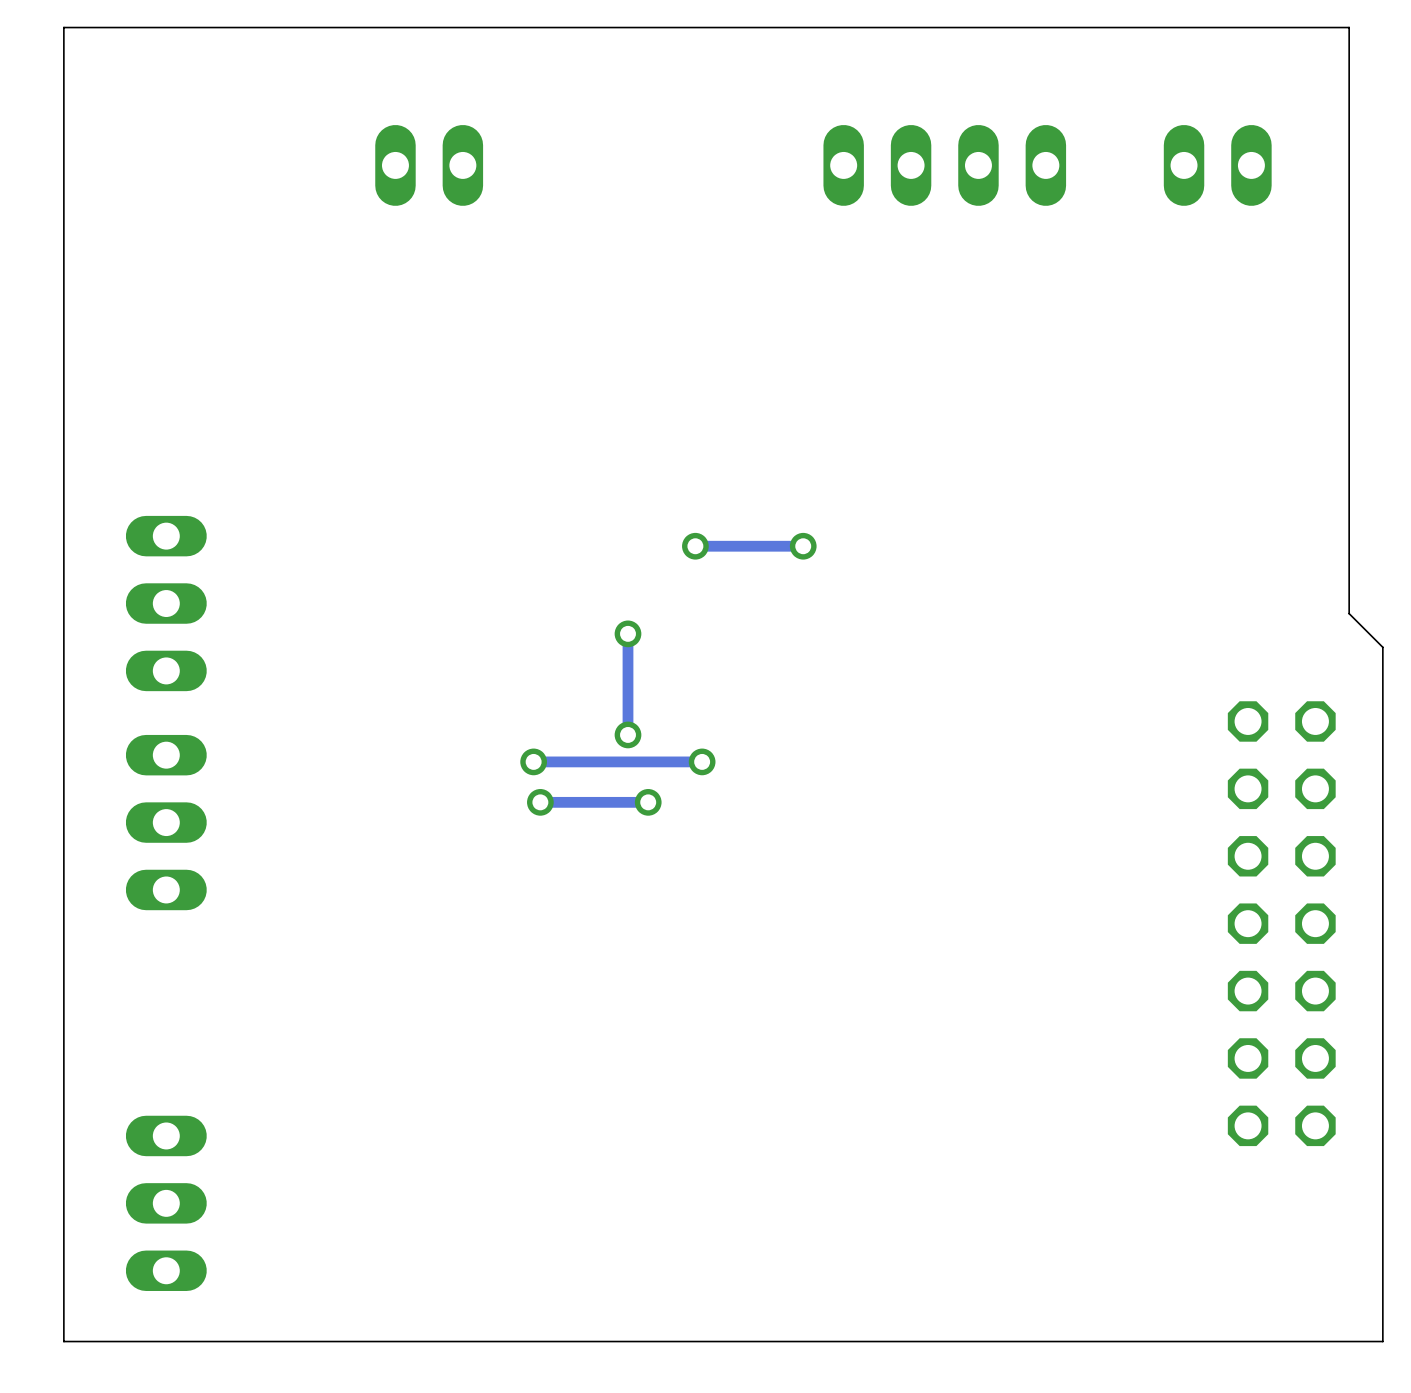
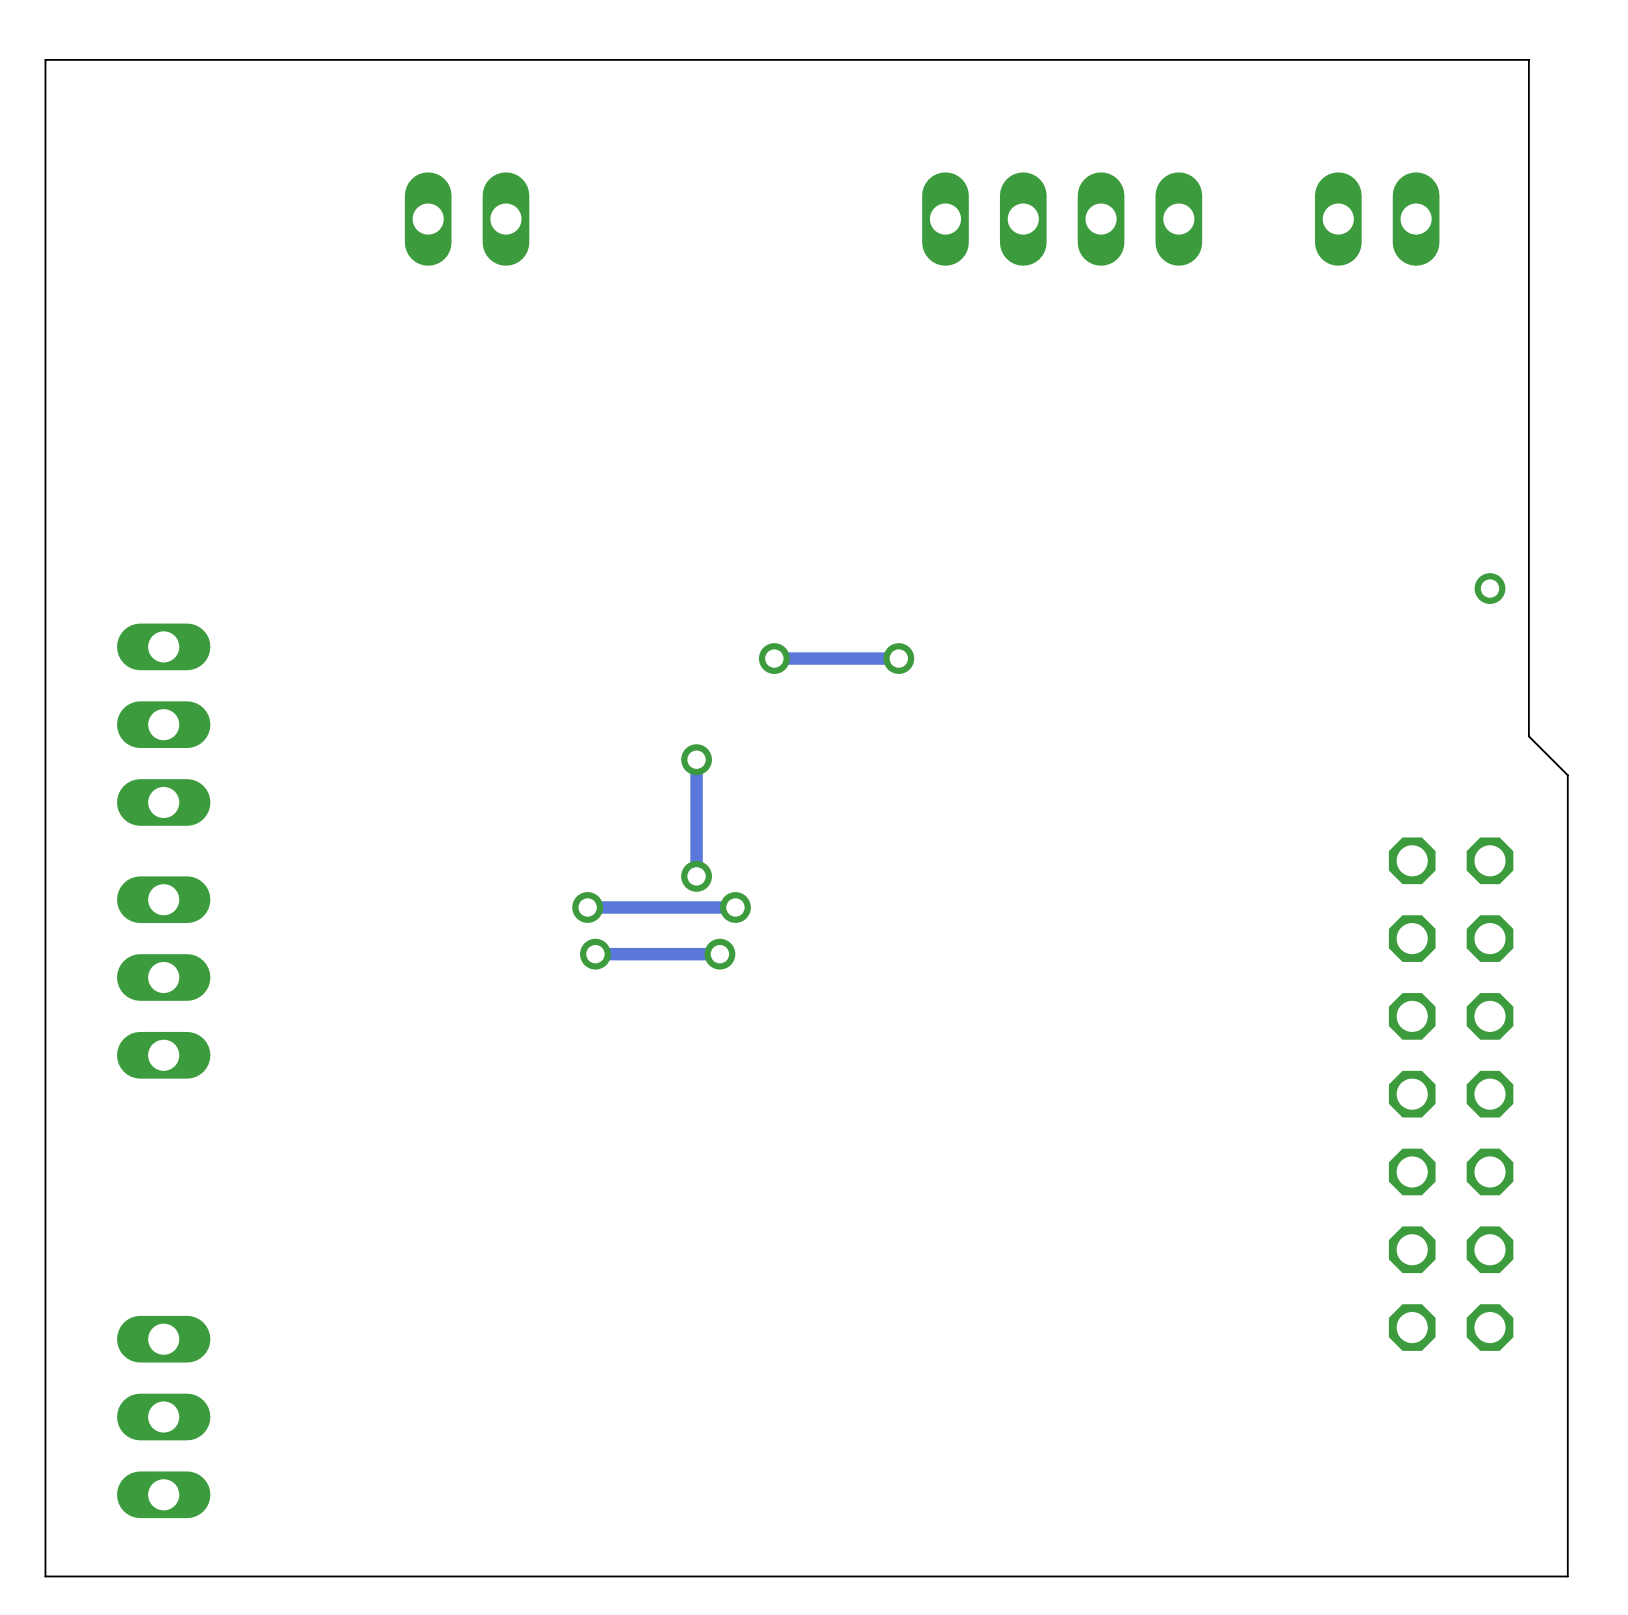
via: none -> (1490, 588)
track: (702, 761) (661, 761) -> none
via position: (702, 761) -> (735, 907)

